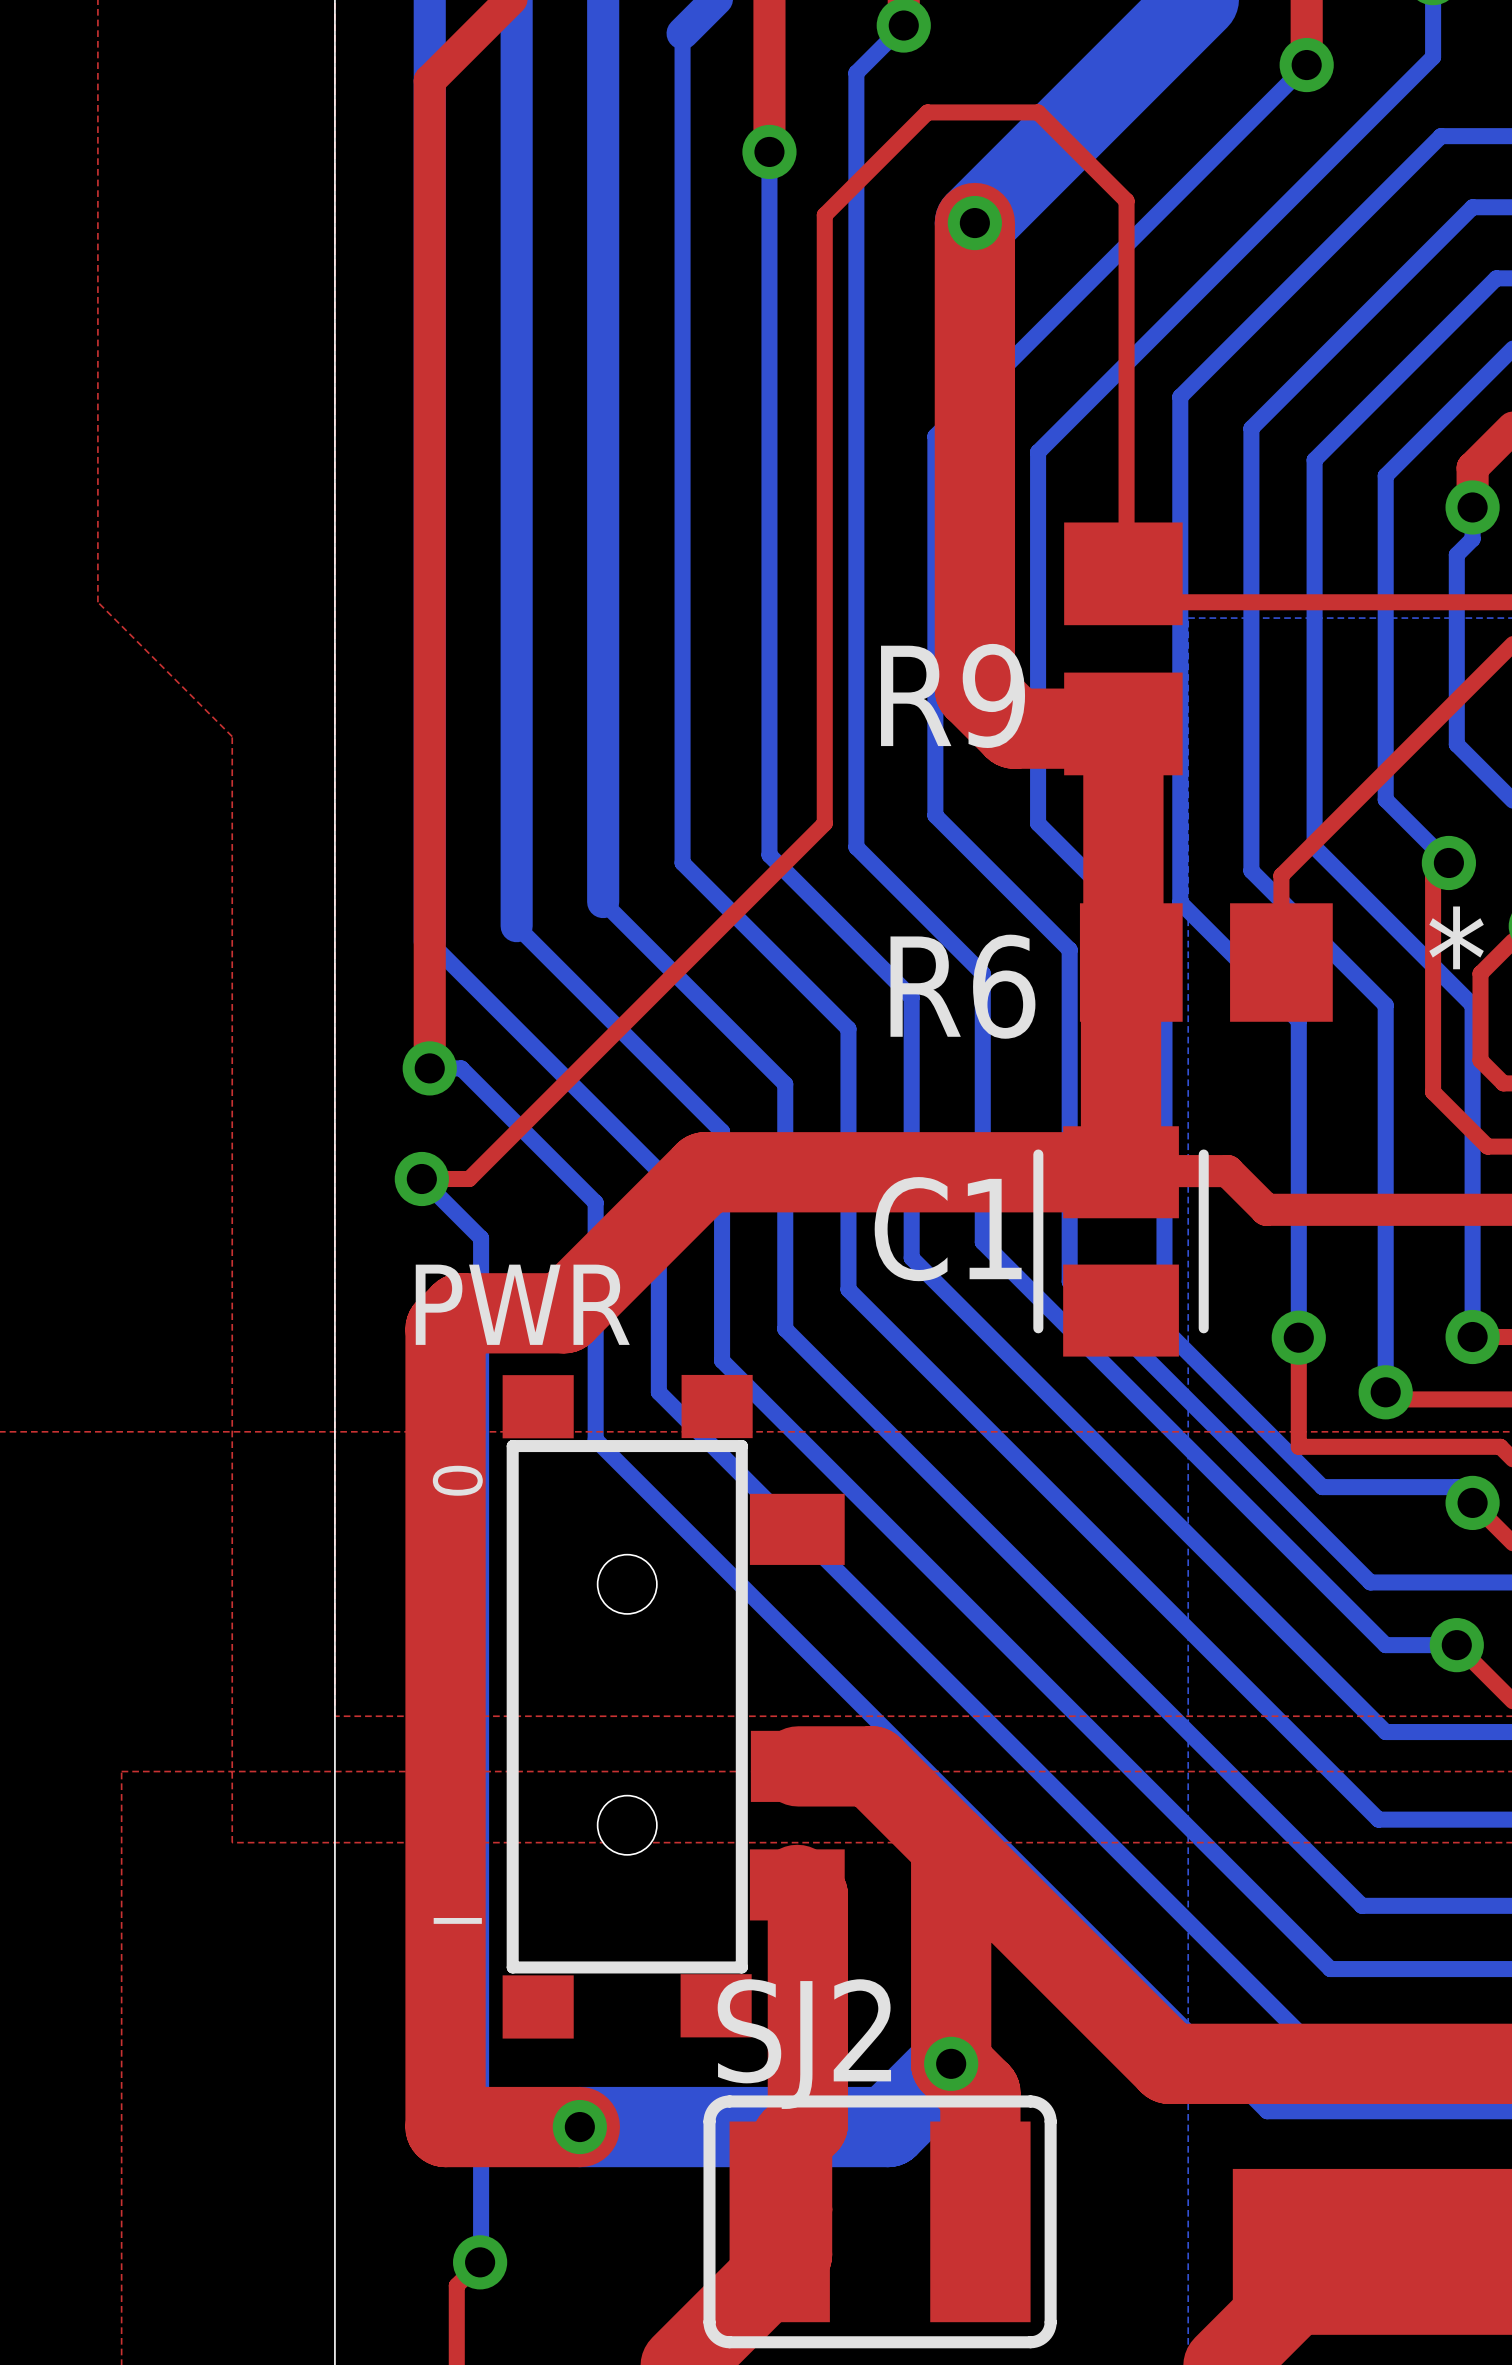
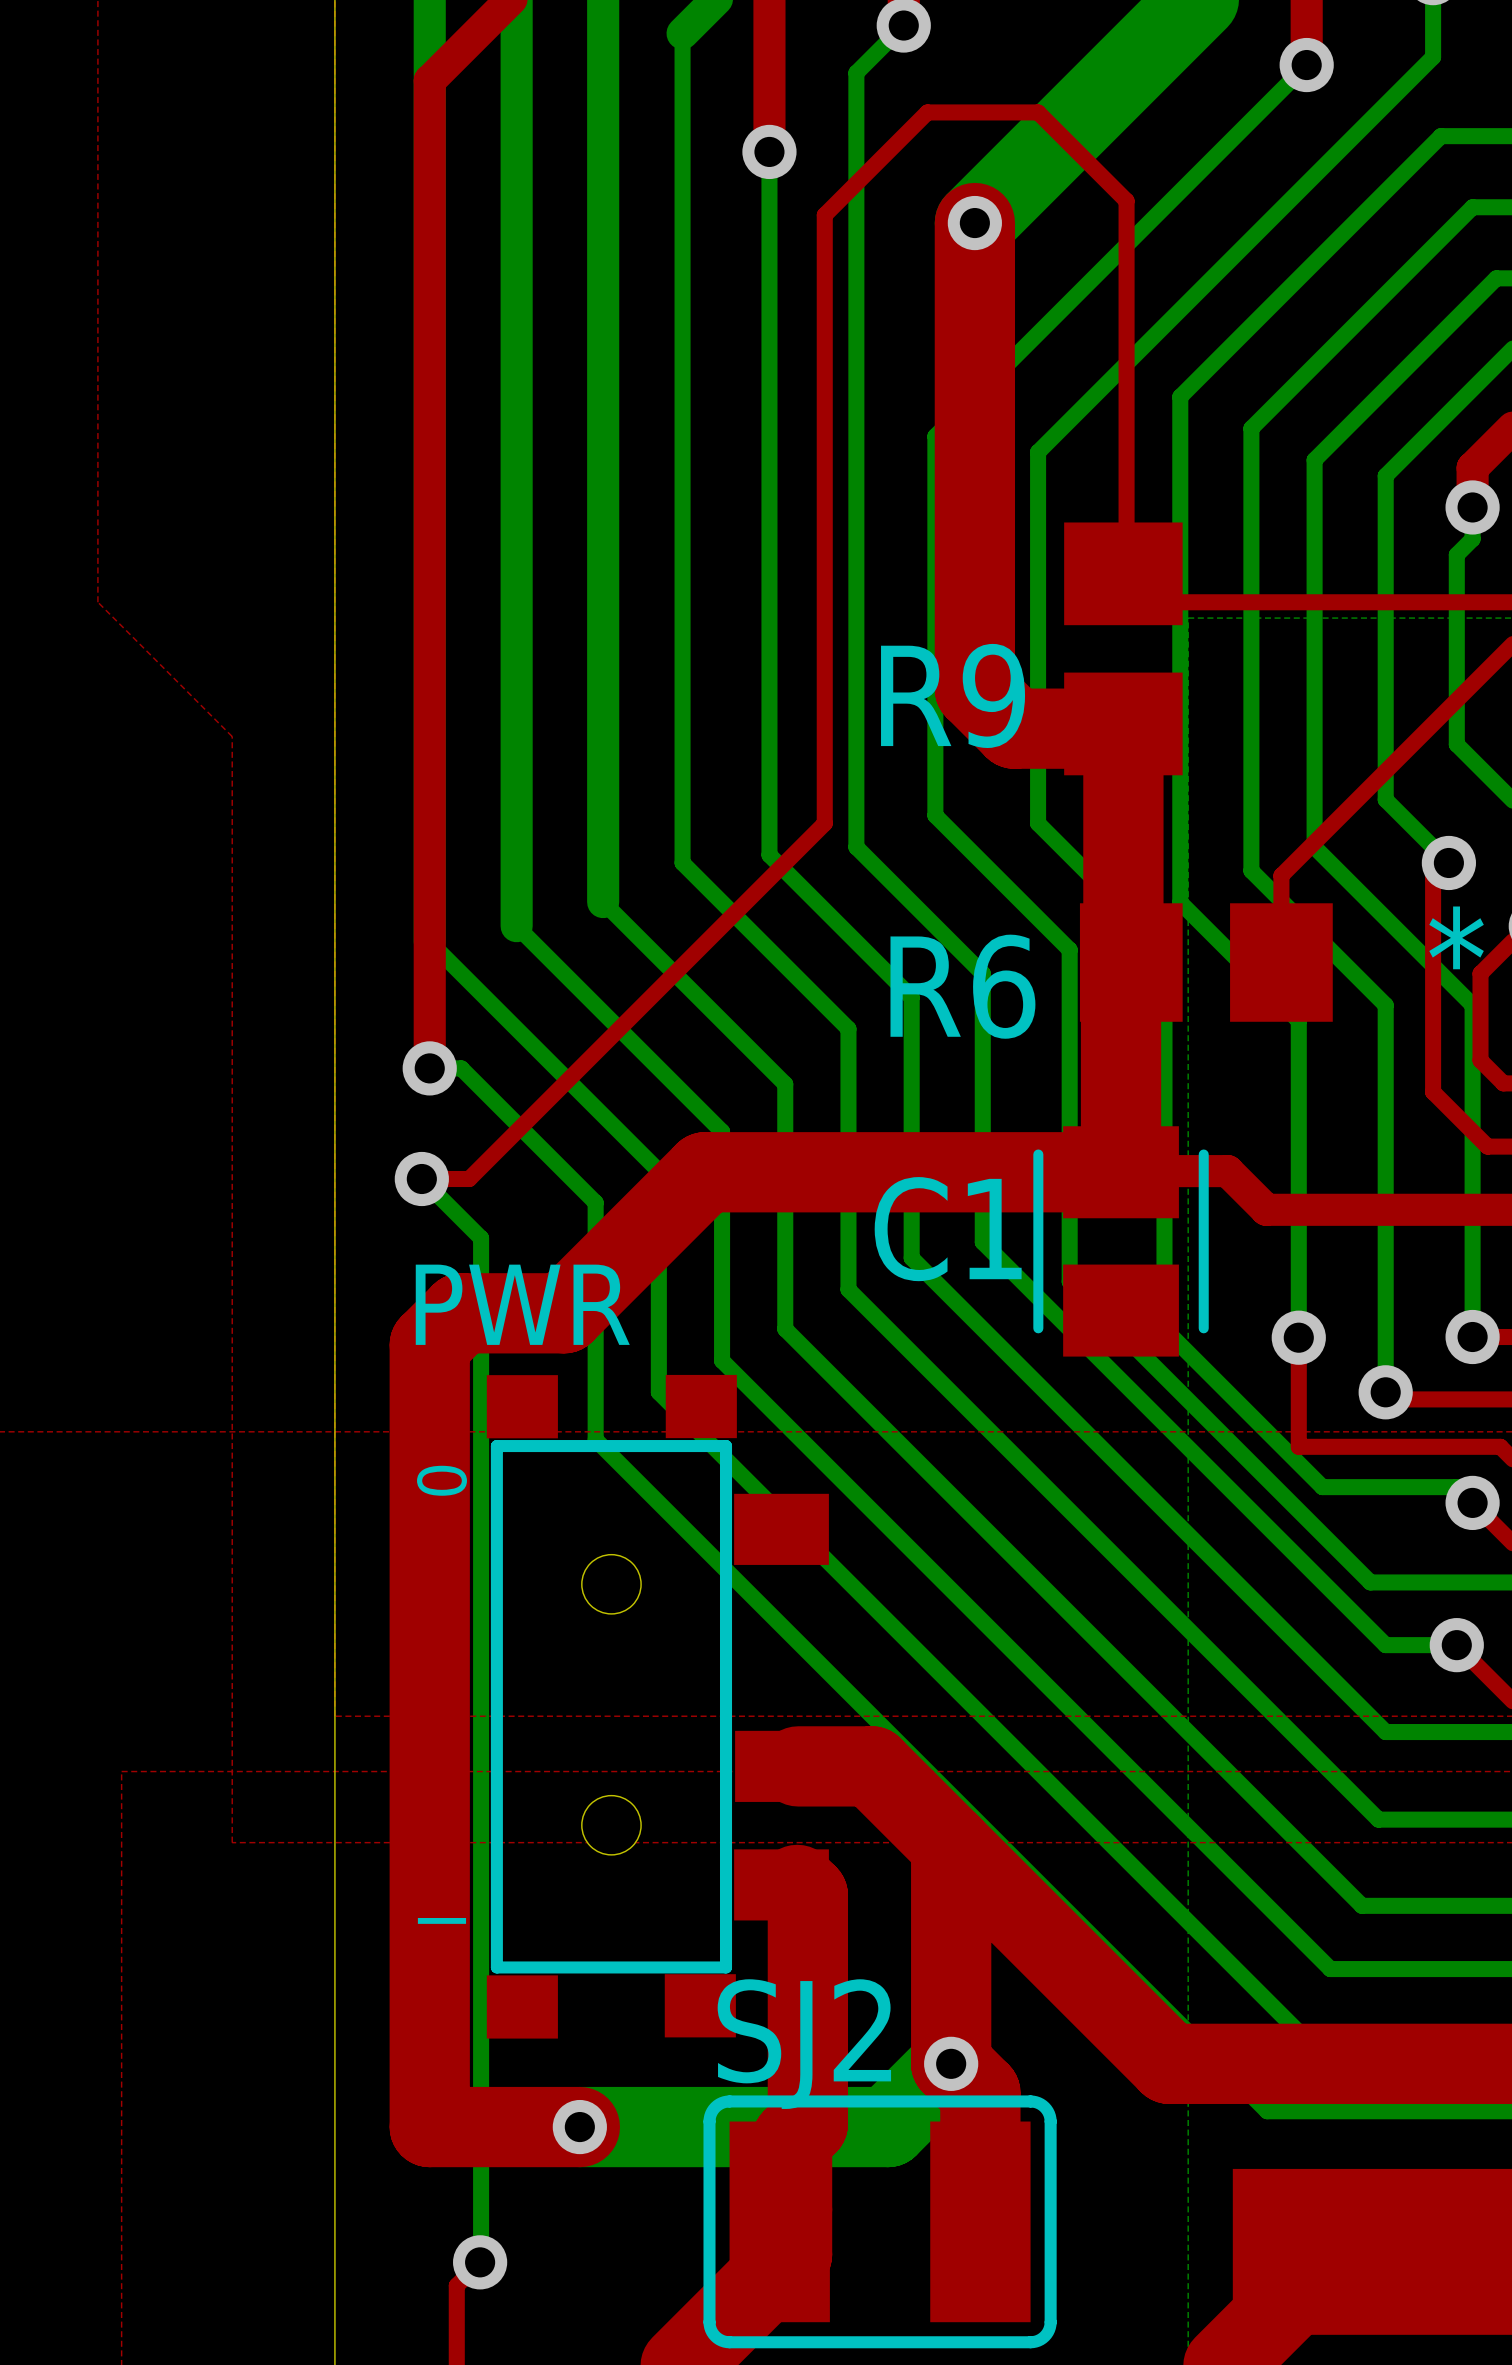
top track: (445, 1329) (445, 2127) -> (445, 1329) (429, 1344) (429, 2127) (445, 2127)
part position: (674, 1706) -> (658, 1706)

